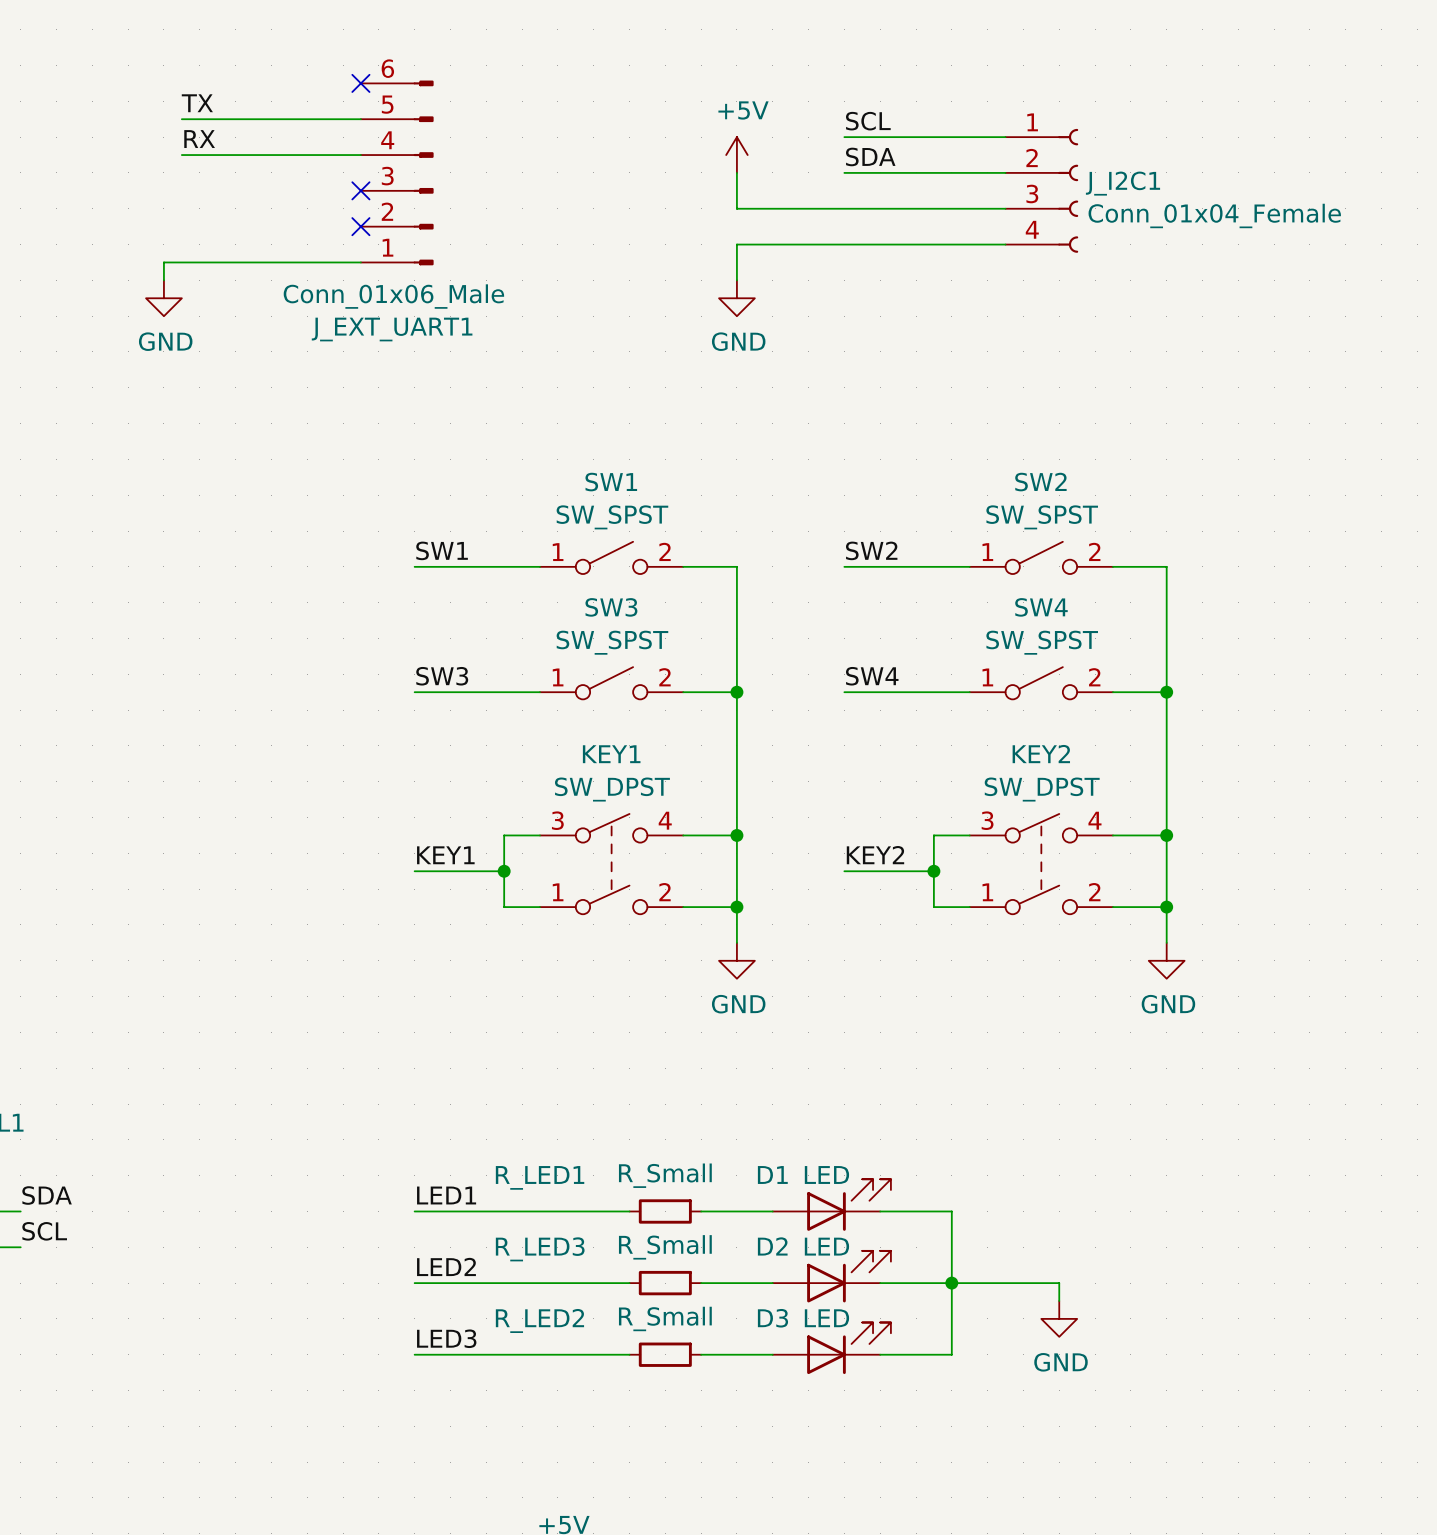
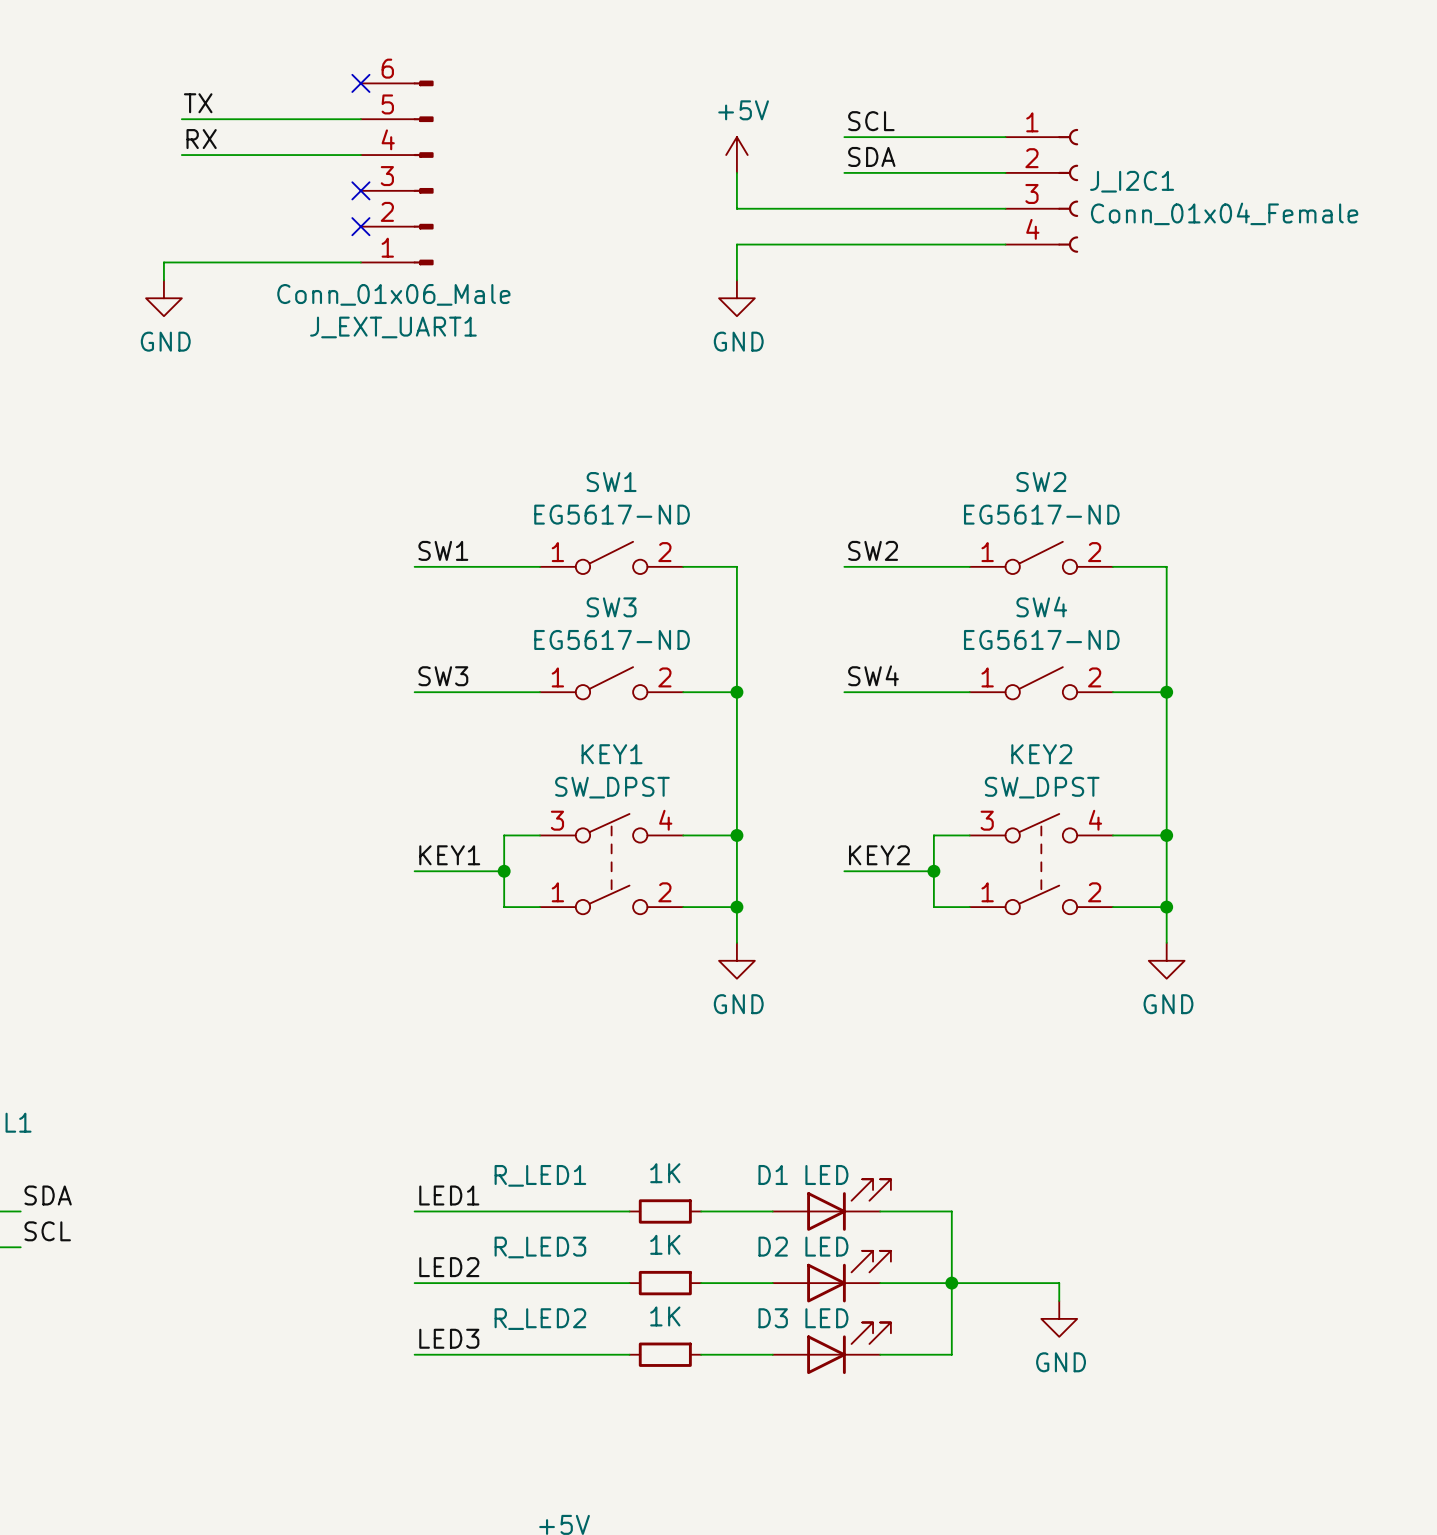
SW1 value: SW_SPST (612, 517) -> EG5617-ND (612, 514)
SW2 value: SW_SPST (1042, 517) -> EG5617-ND (1041, 514)
SW3 value: SW_SPST (612, 642) -> EG5617-ND (612, 639)
SW4 value: SW_SPST (1042, 642) -> EG5617-ND (1041, 639)
R_LED1 value: R_Small (665, 1175) -> 1K (665, 1173)
R_LED3 value: R_Small (665, 1247) -> 1K (665, 1244)
R_LED2 value: R_Small (665, 1318) -> 1K (665, 1316)

